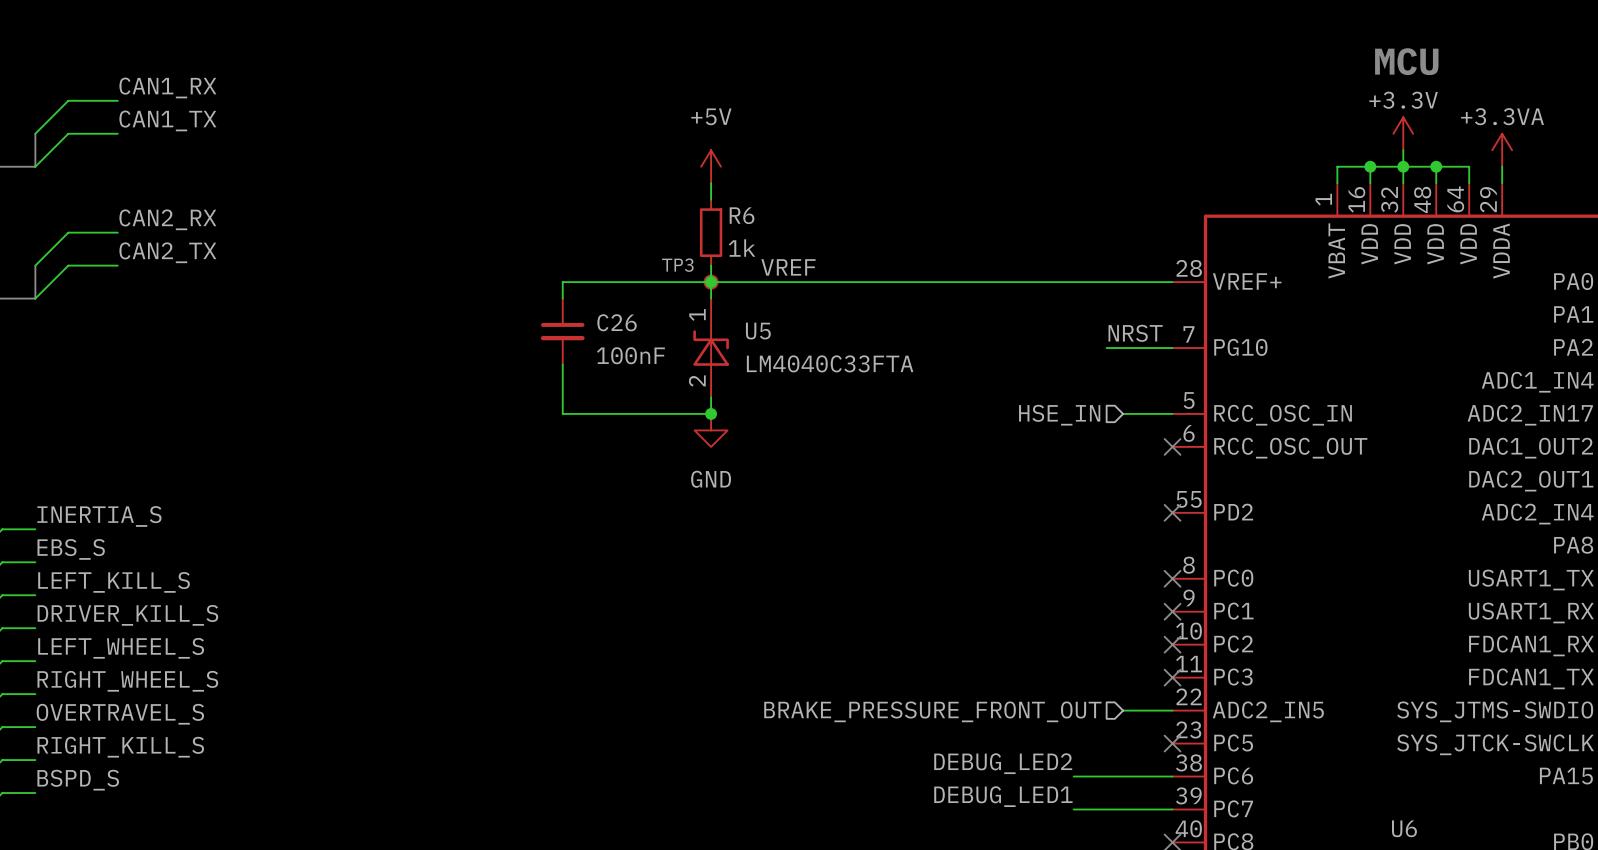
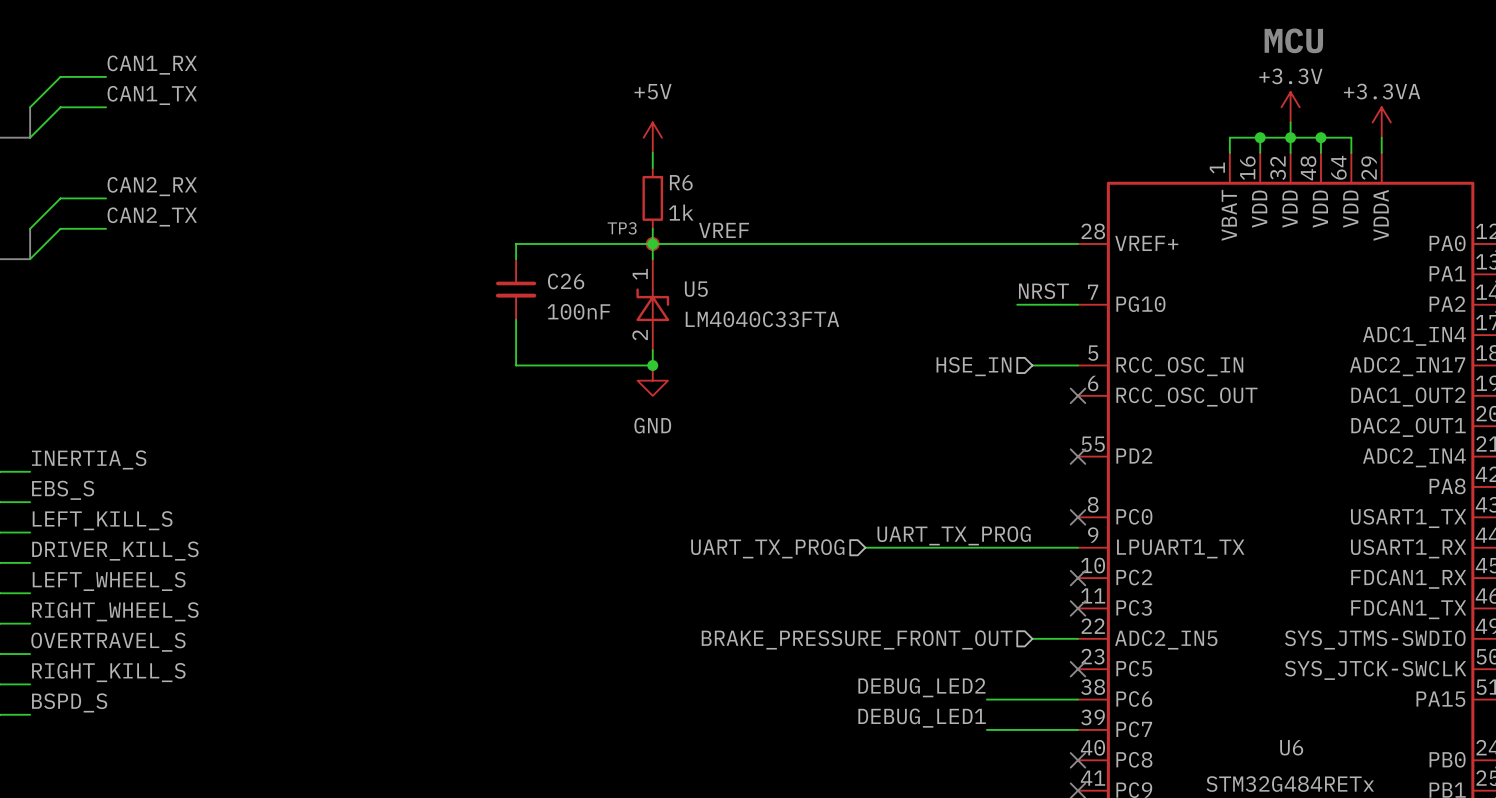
label: none -> UART_TX_PROG (954, 535)
wire: none -> (865, 547) (1077, 547)
no-connect mark: (1172, 611) -> none
U6 pin name: PC1 (1233, 611) -> LPUART1_TX (1180, 548)
hierarchical label: none -> UART_TX_PROG (767, 548)

